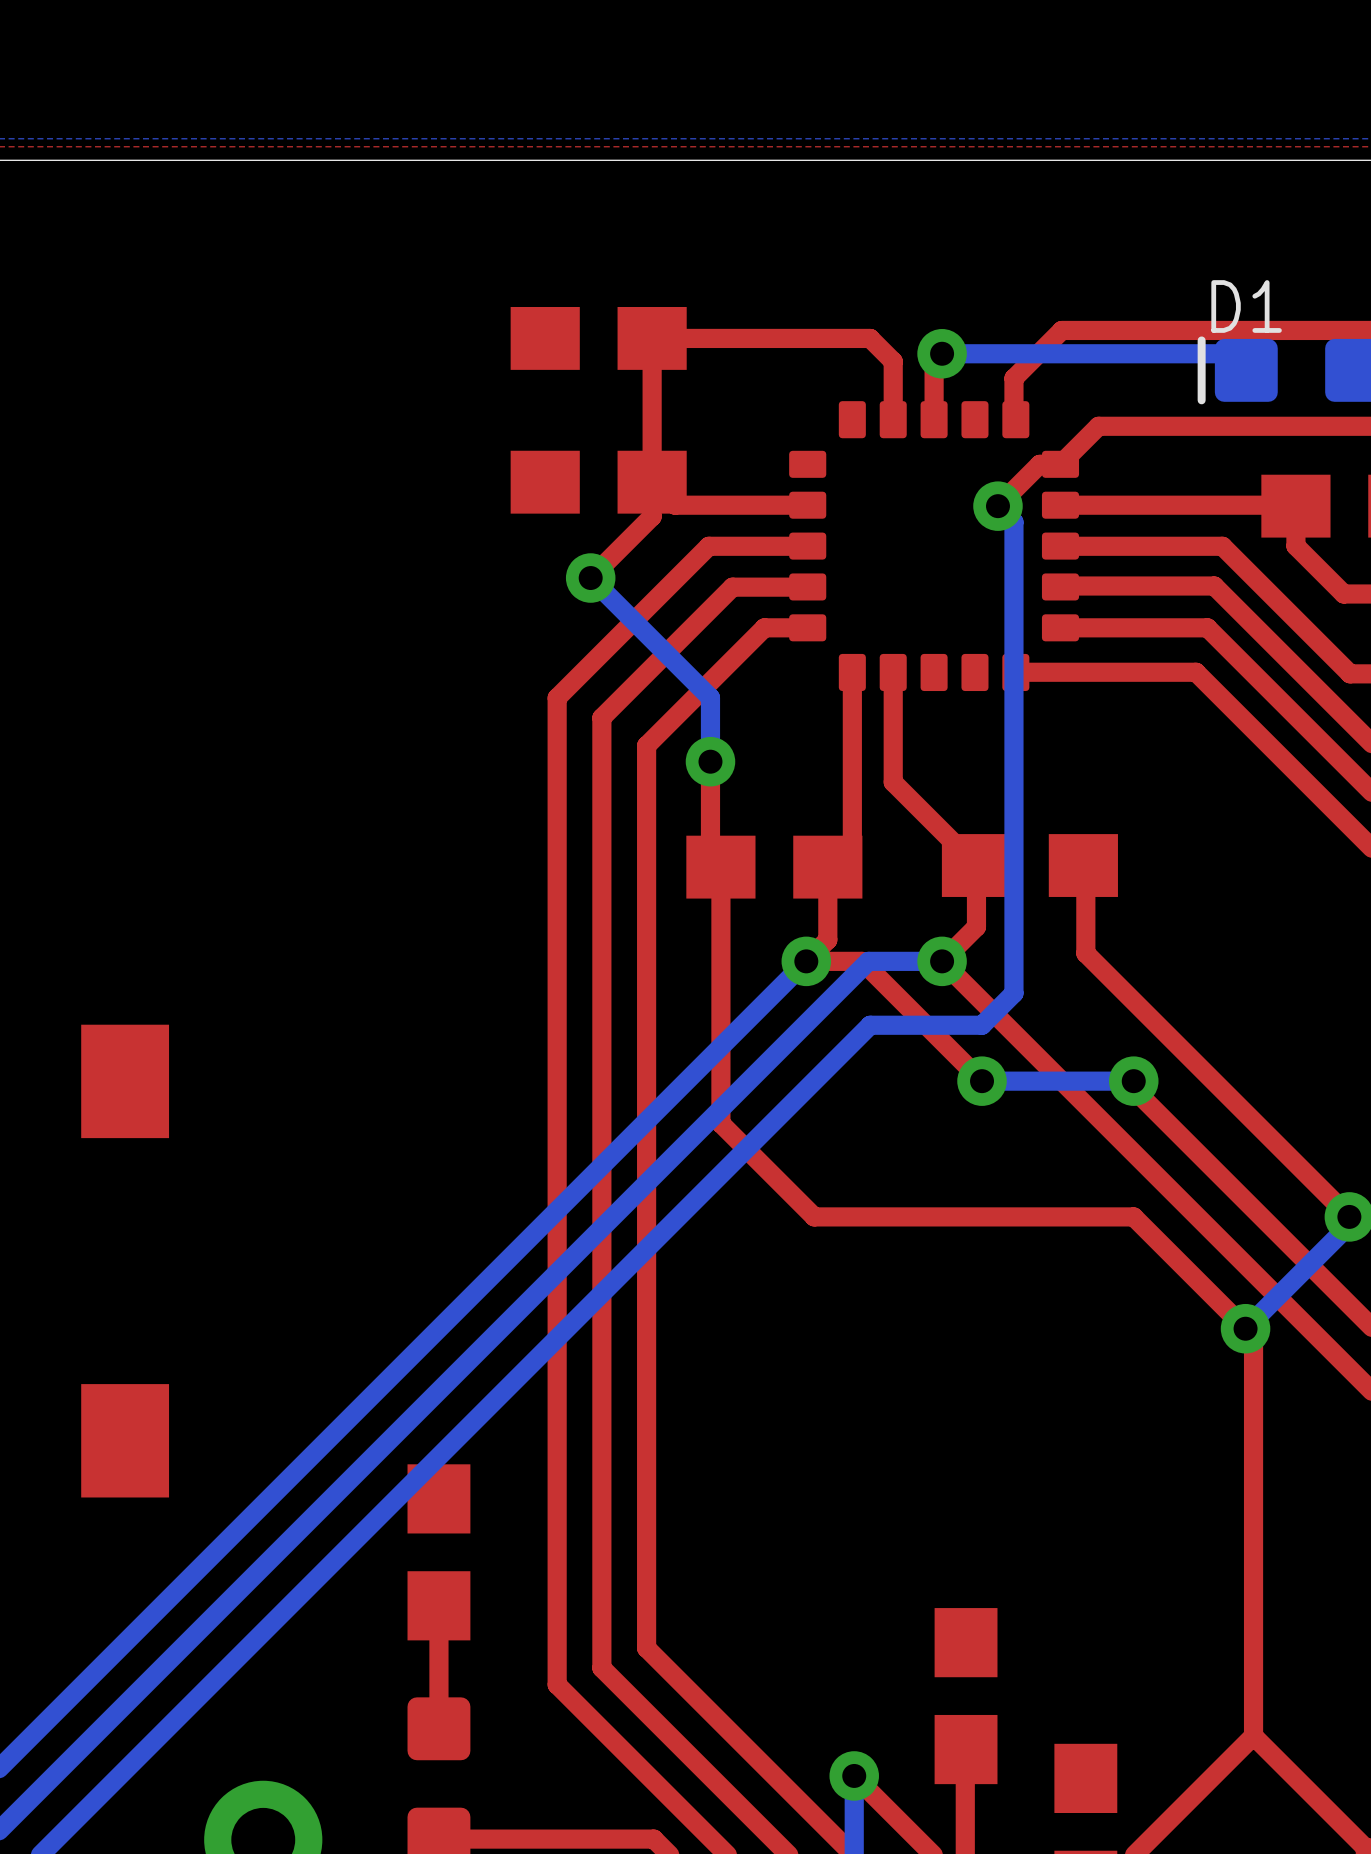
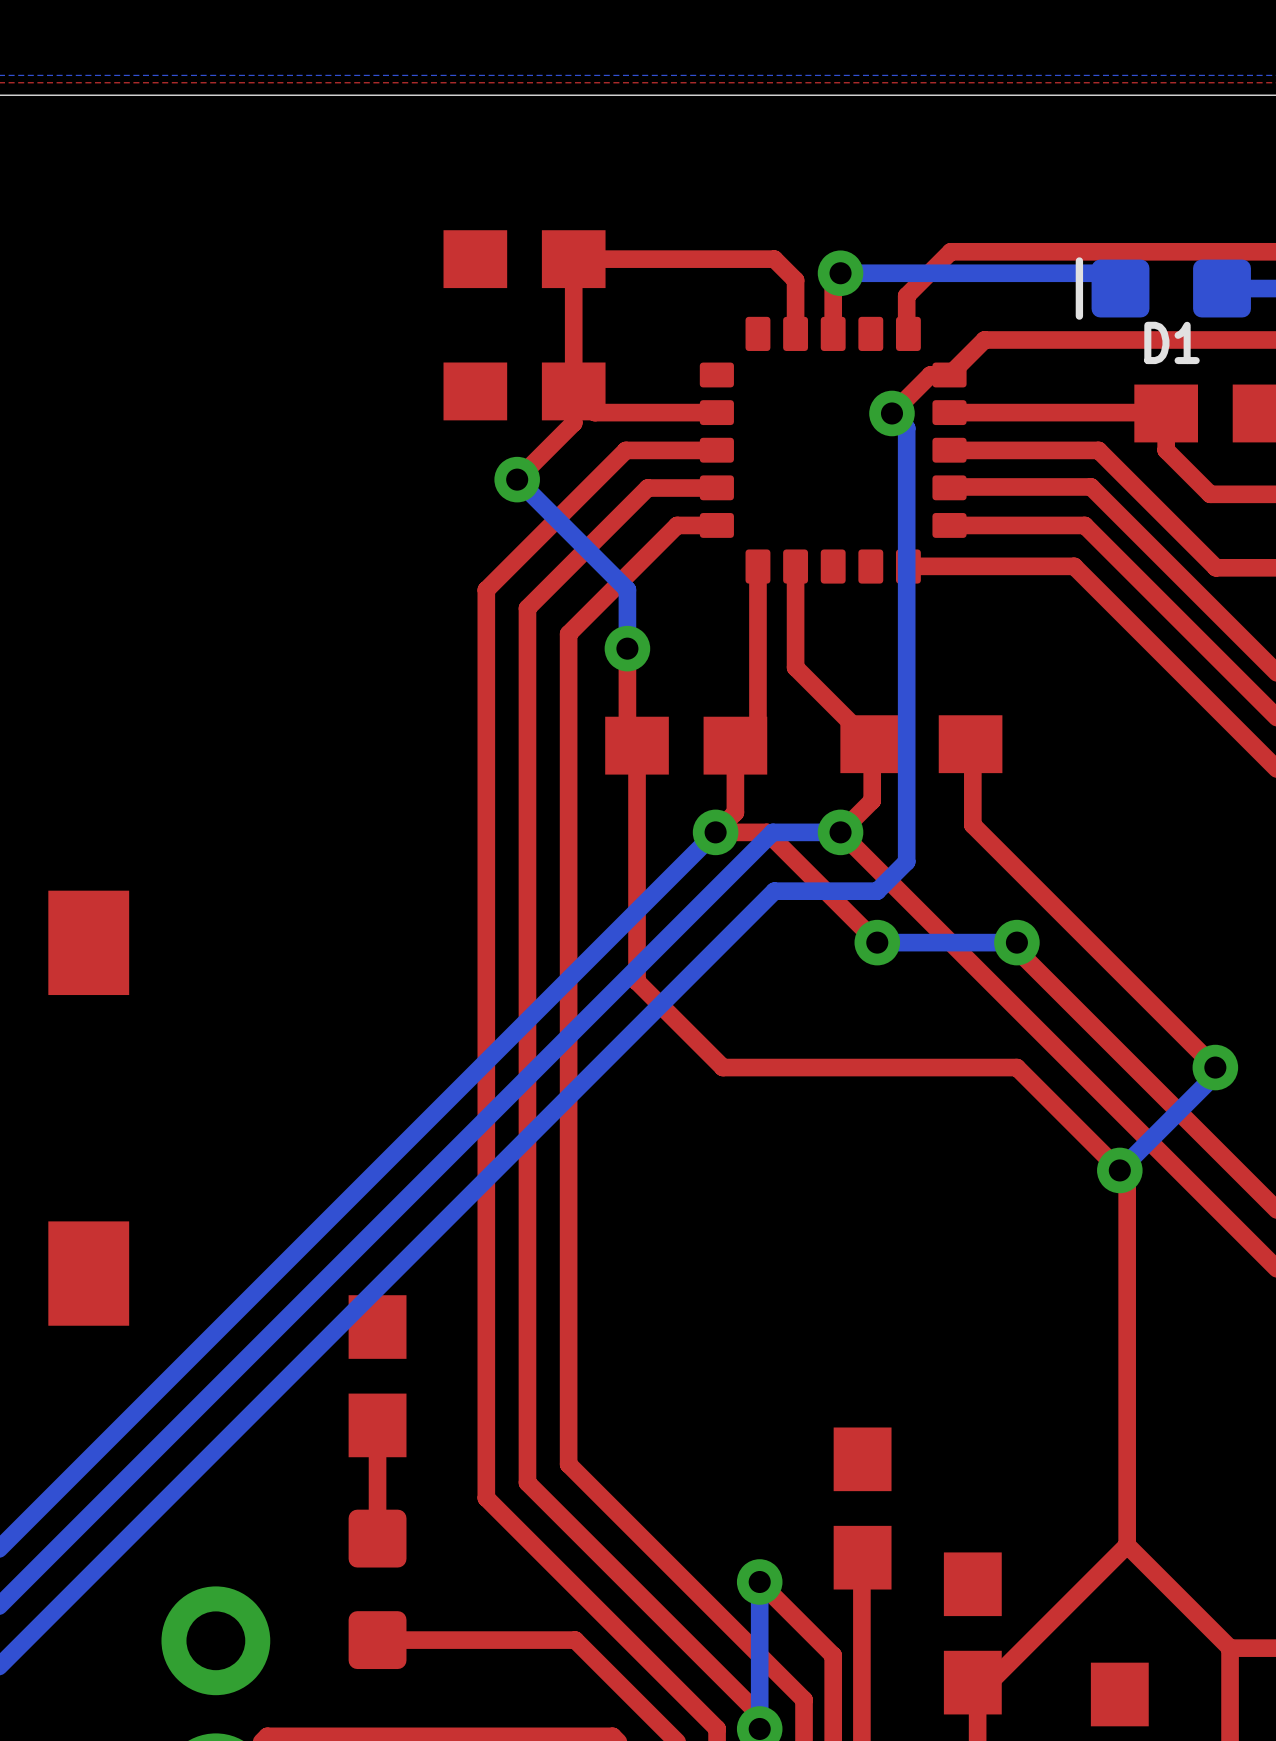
D1 name position: D1 (1246, 306) -> D1 (1172, 342)

